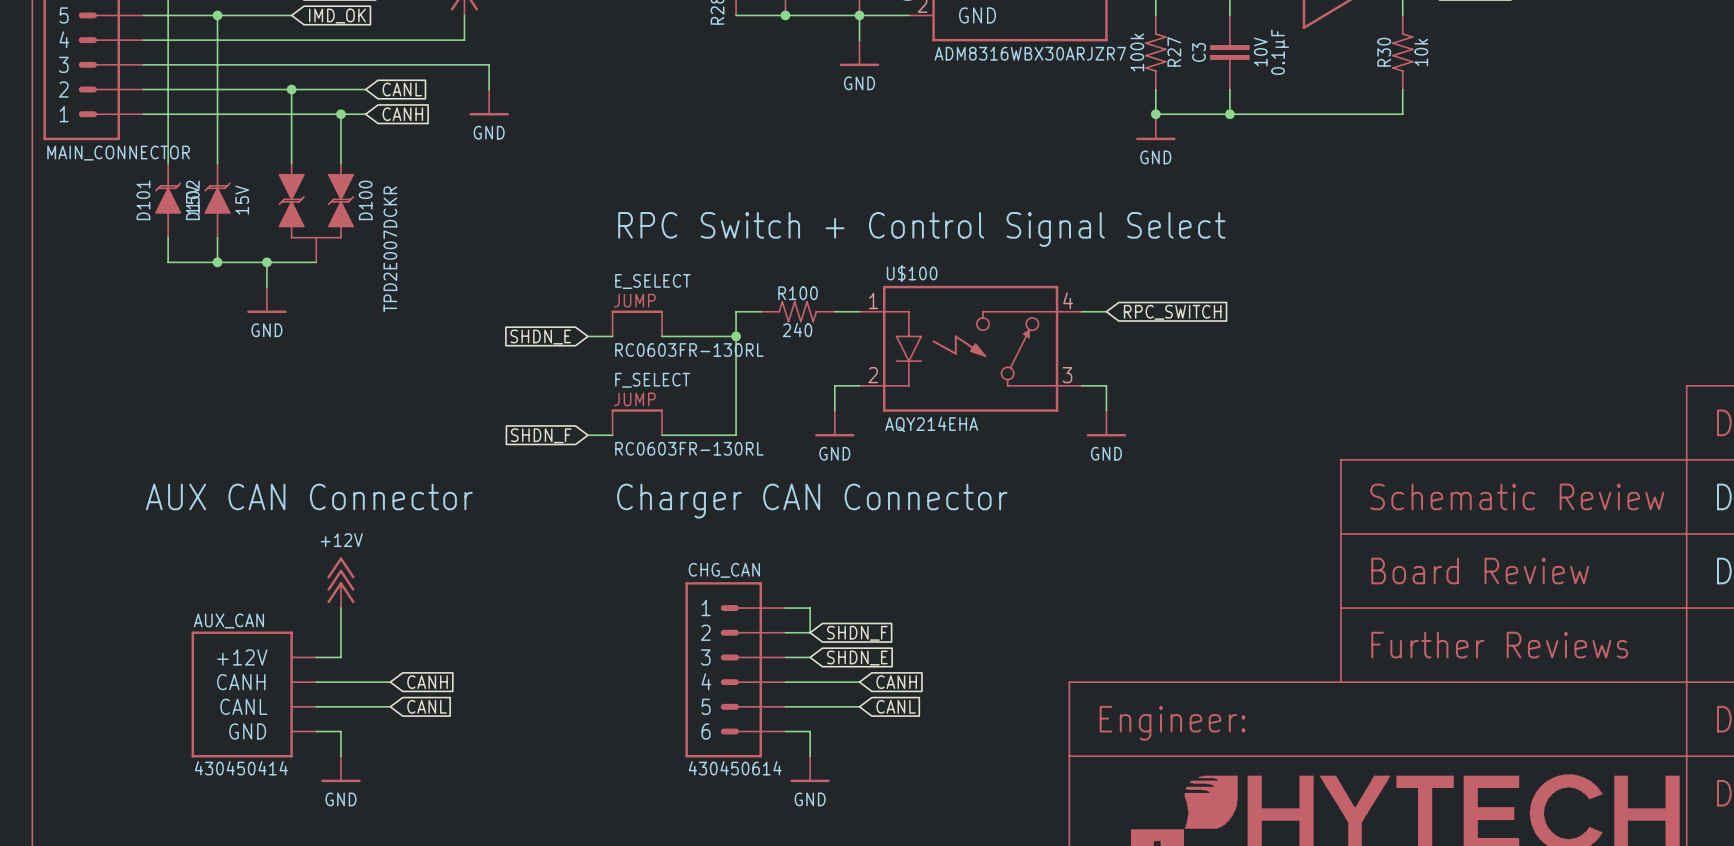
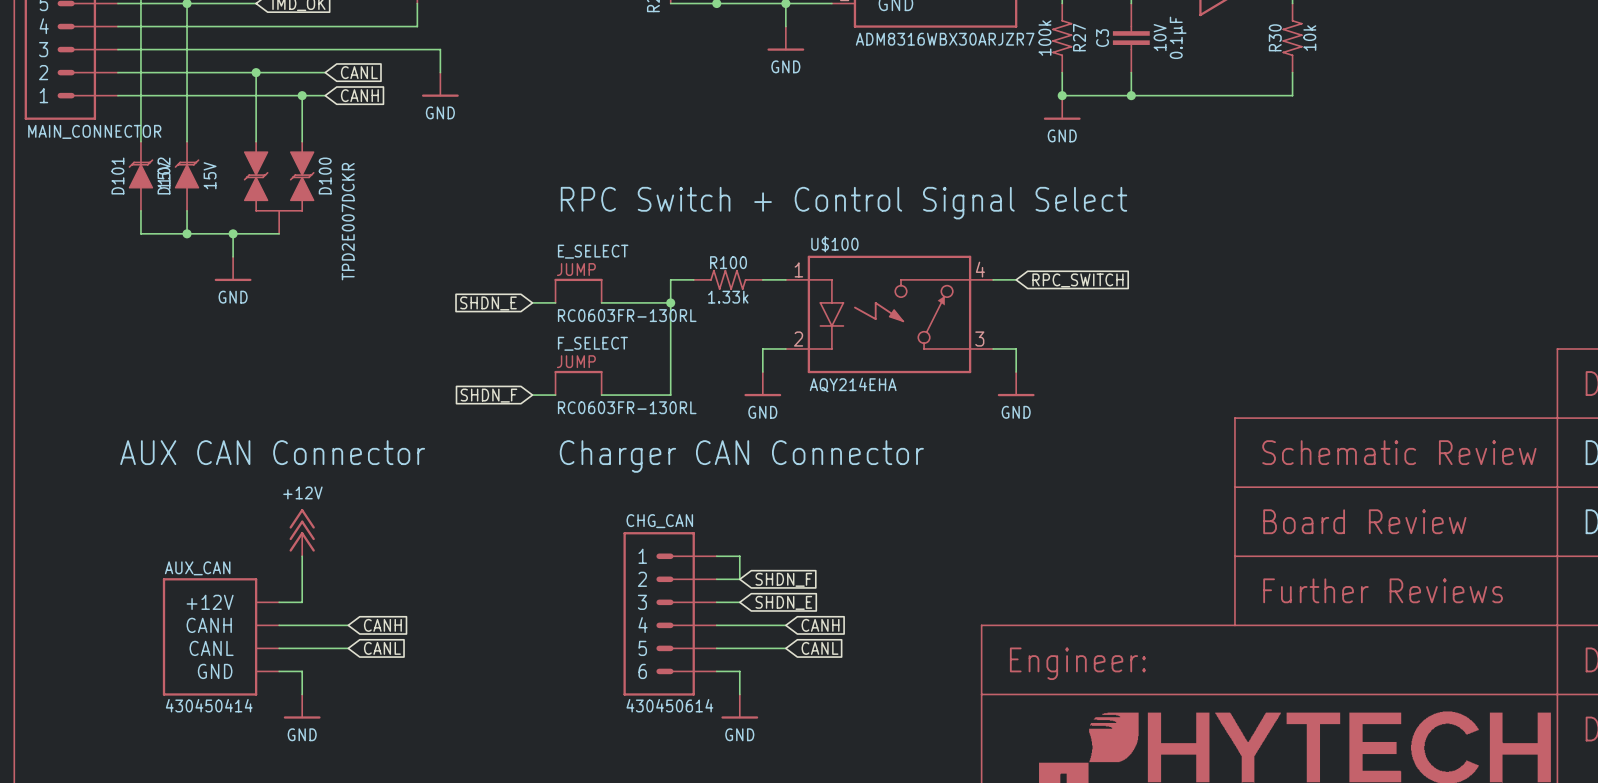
R100 text: 240 (797, 329) -> 1.33k (728, 297)

